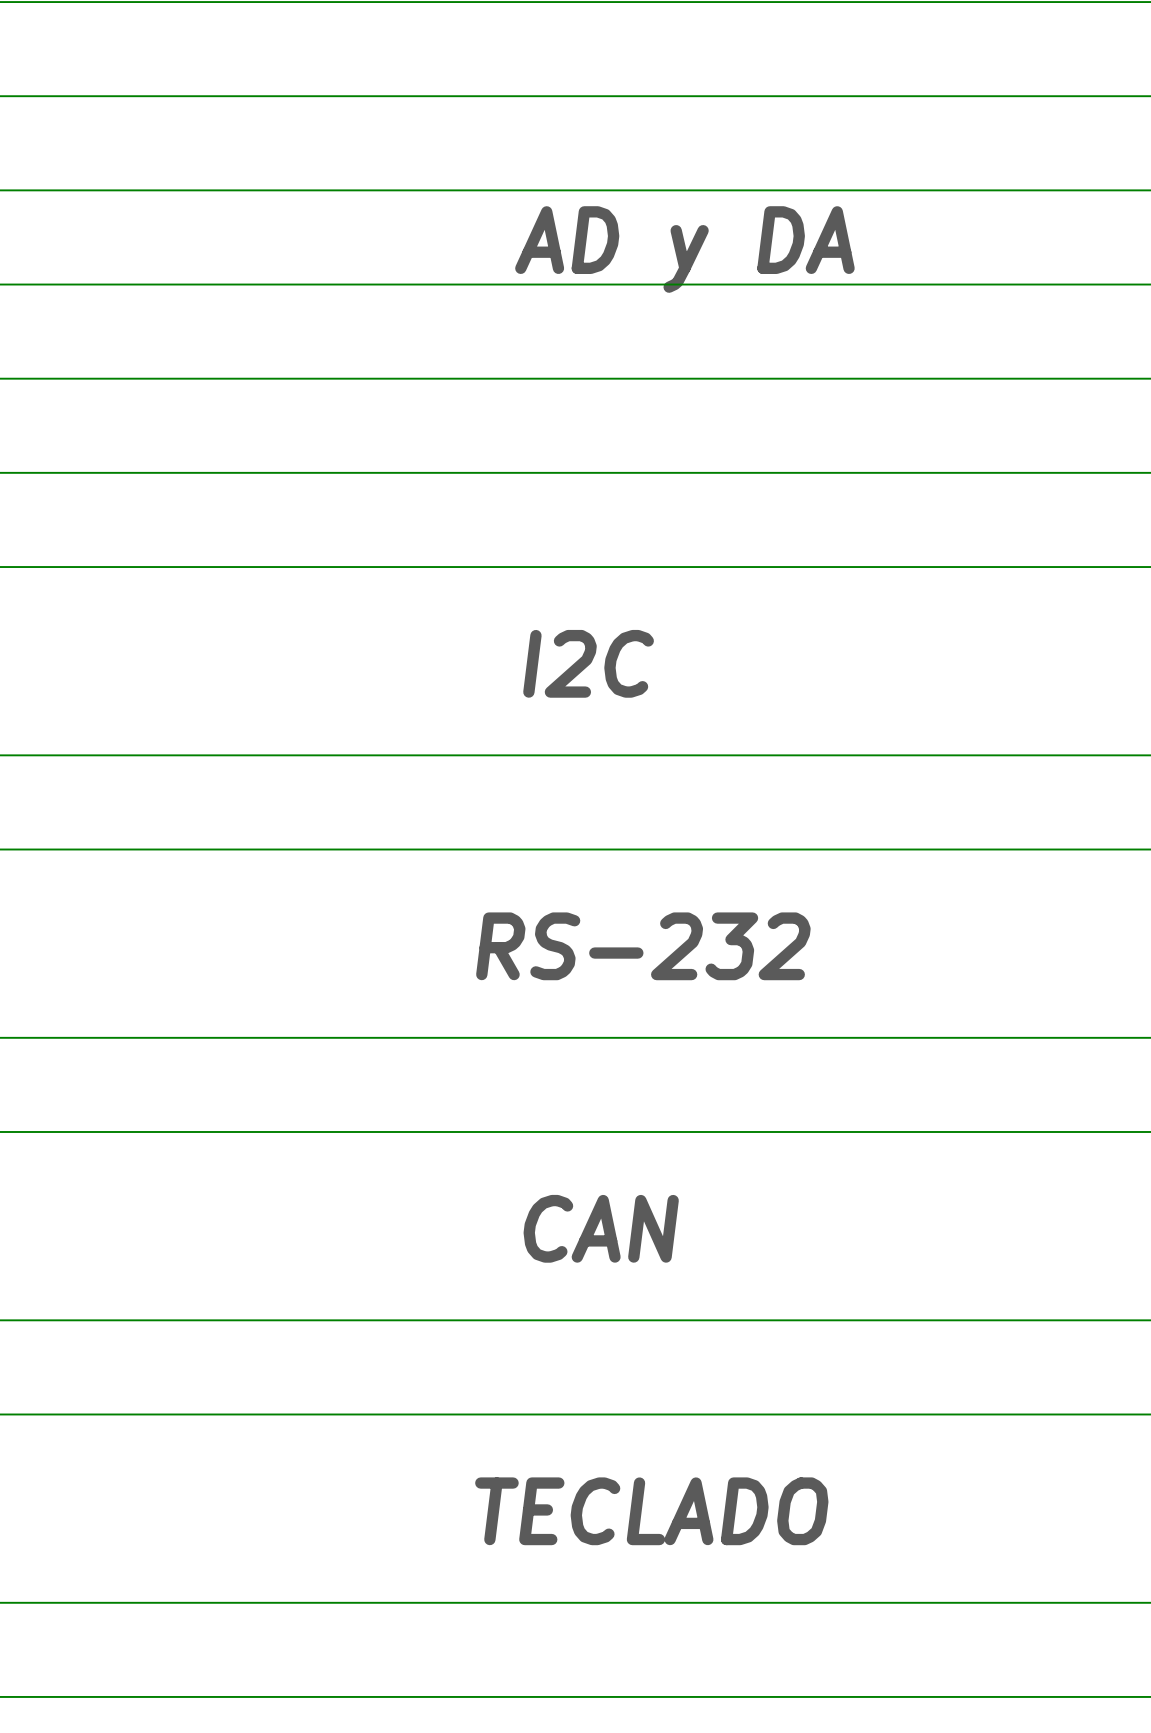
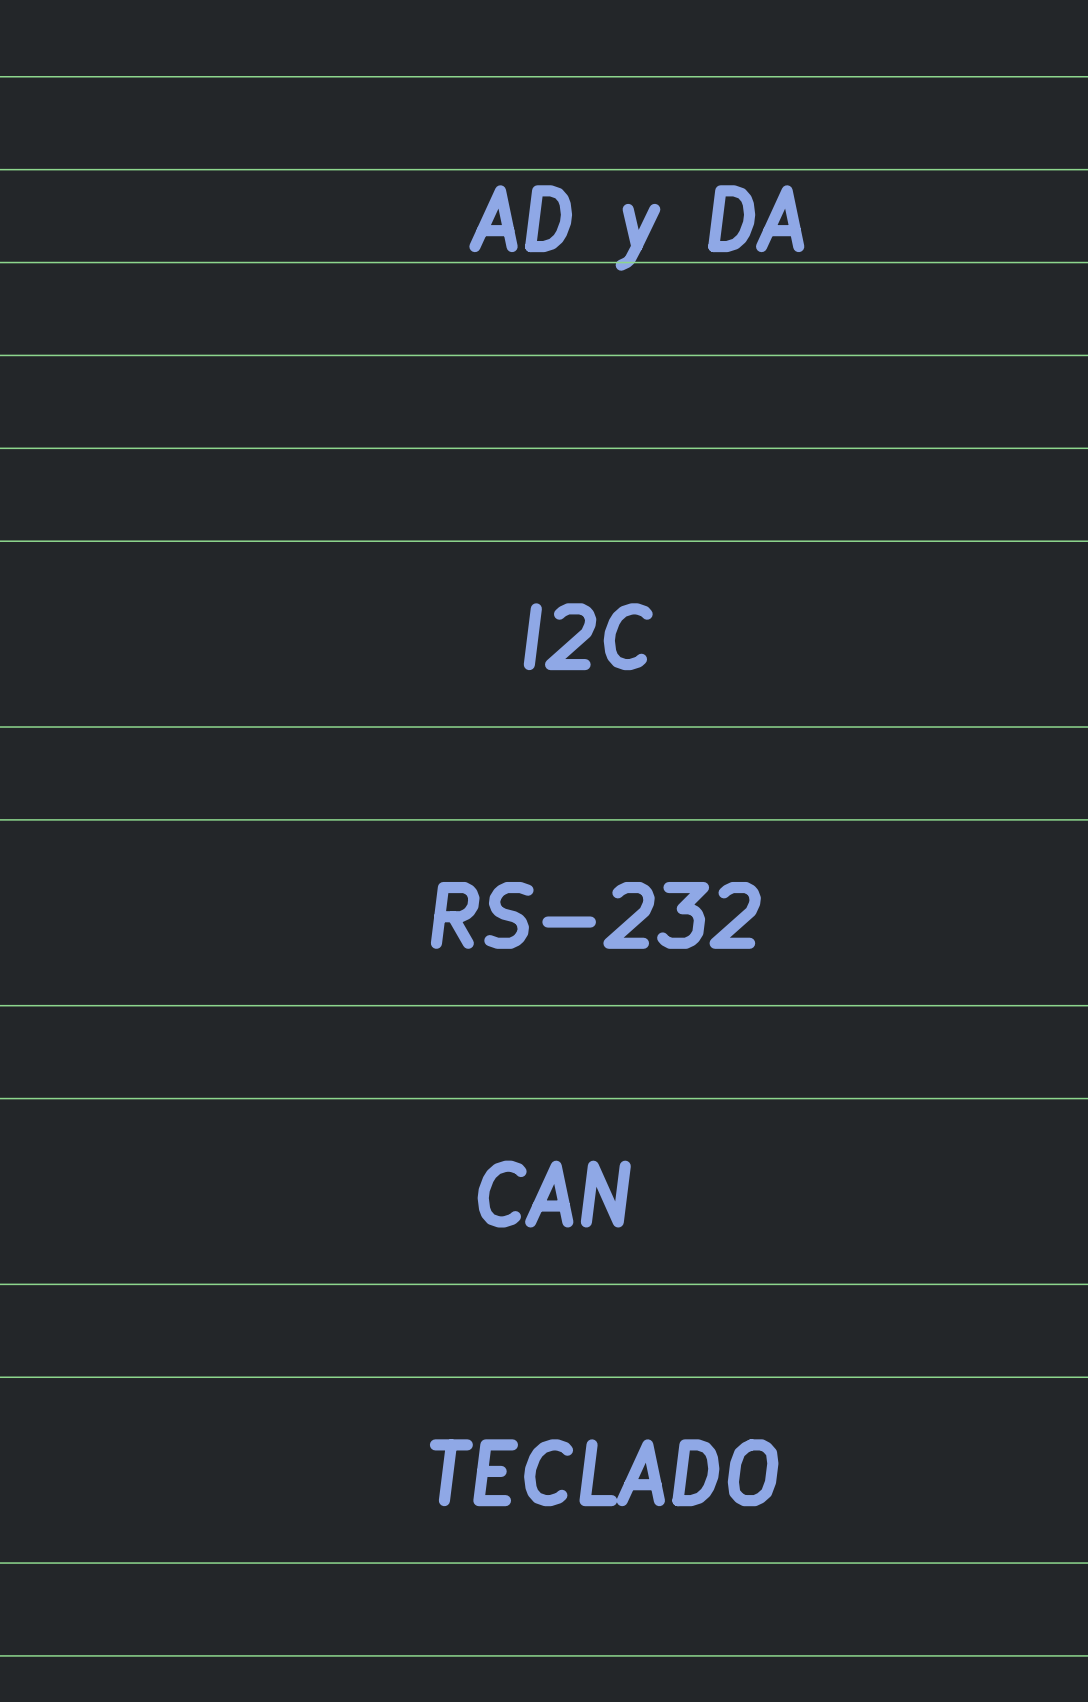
text position: I2C (588, 663) -> I2C (588, 636)

